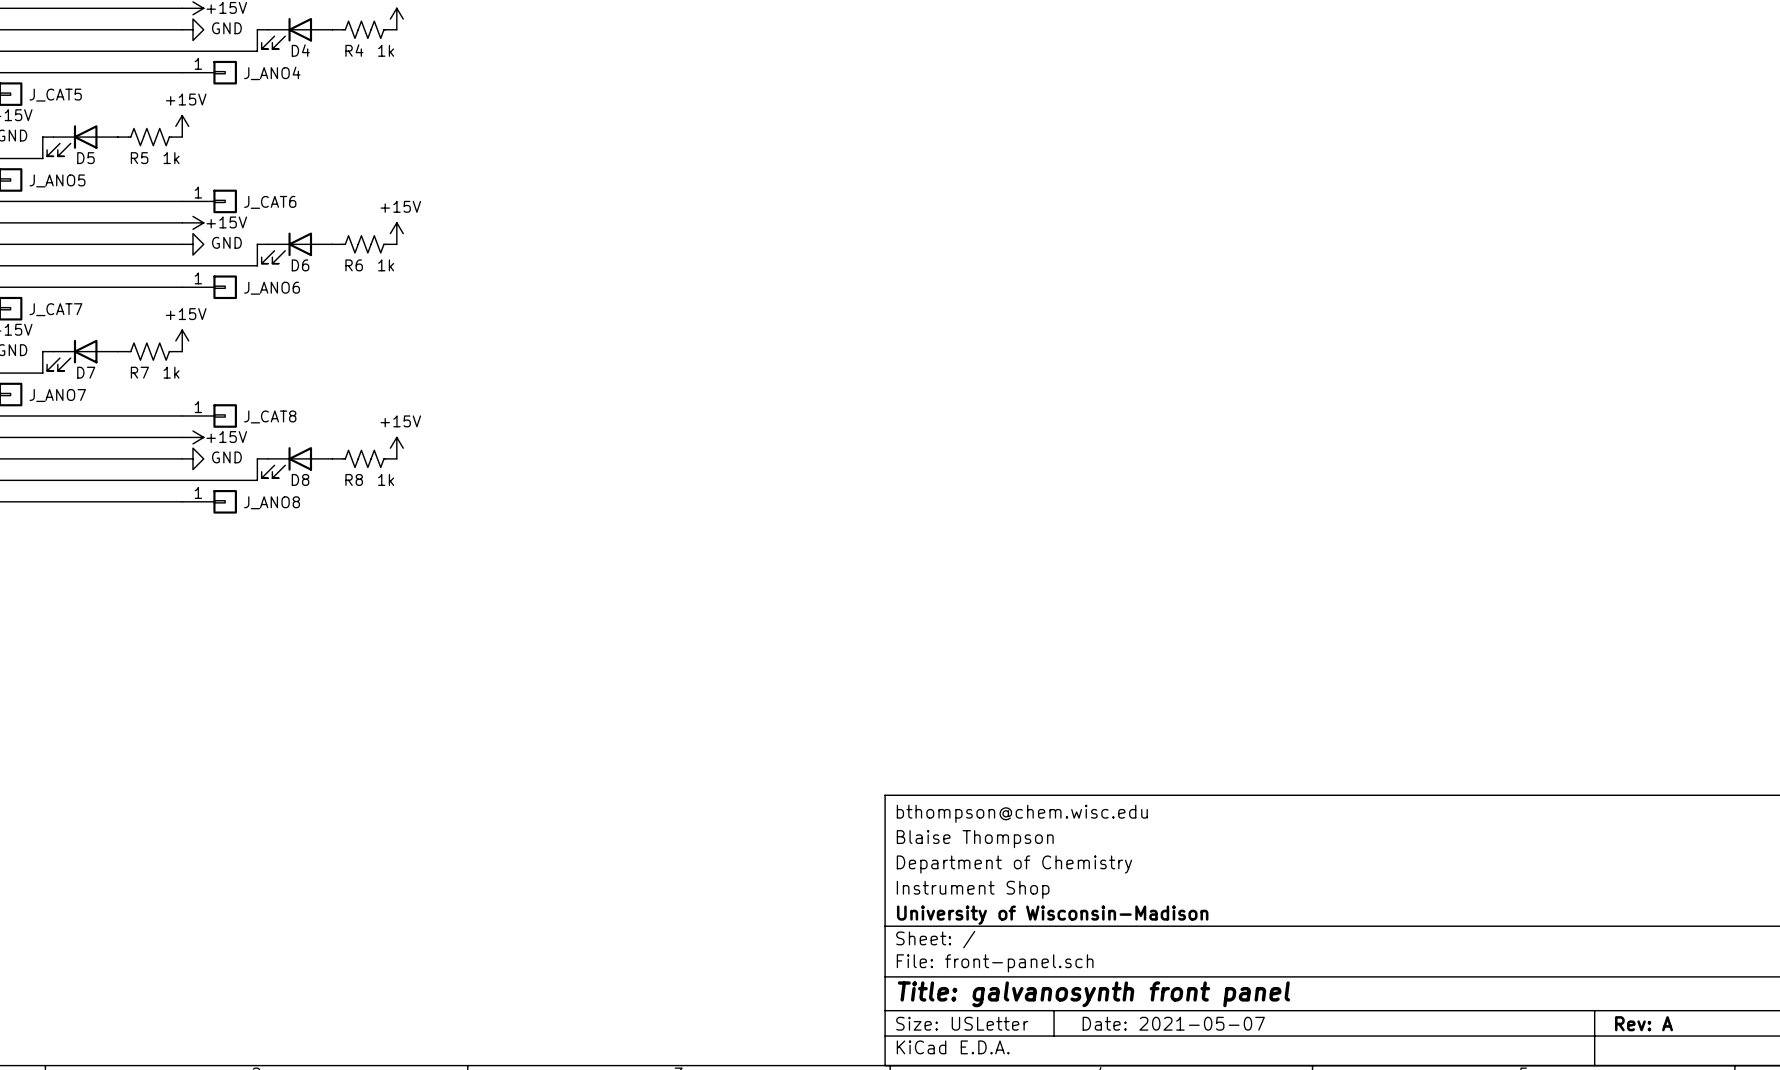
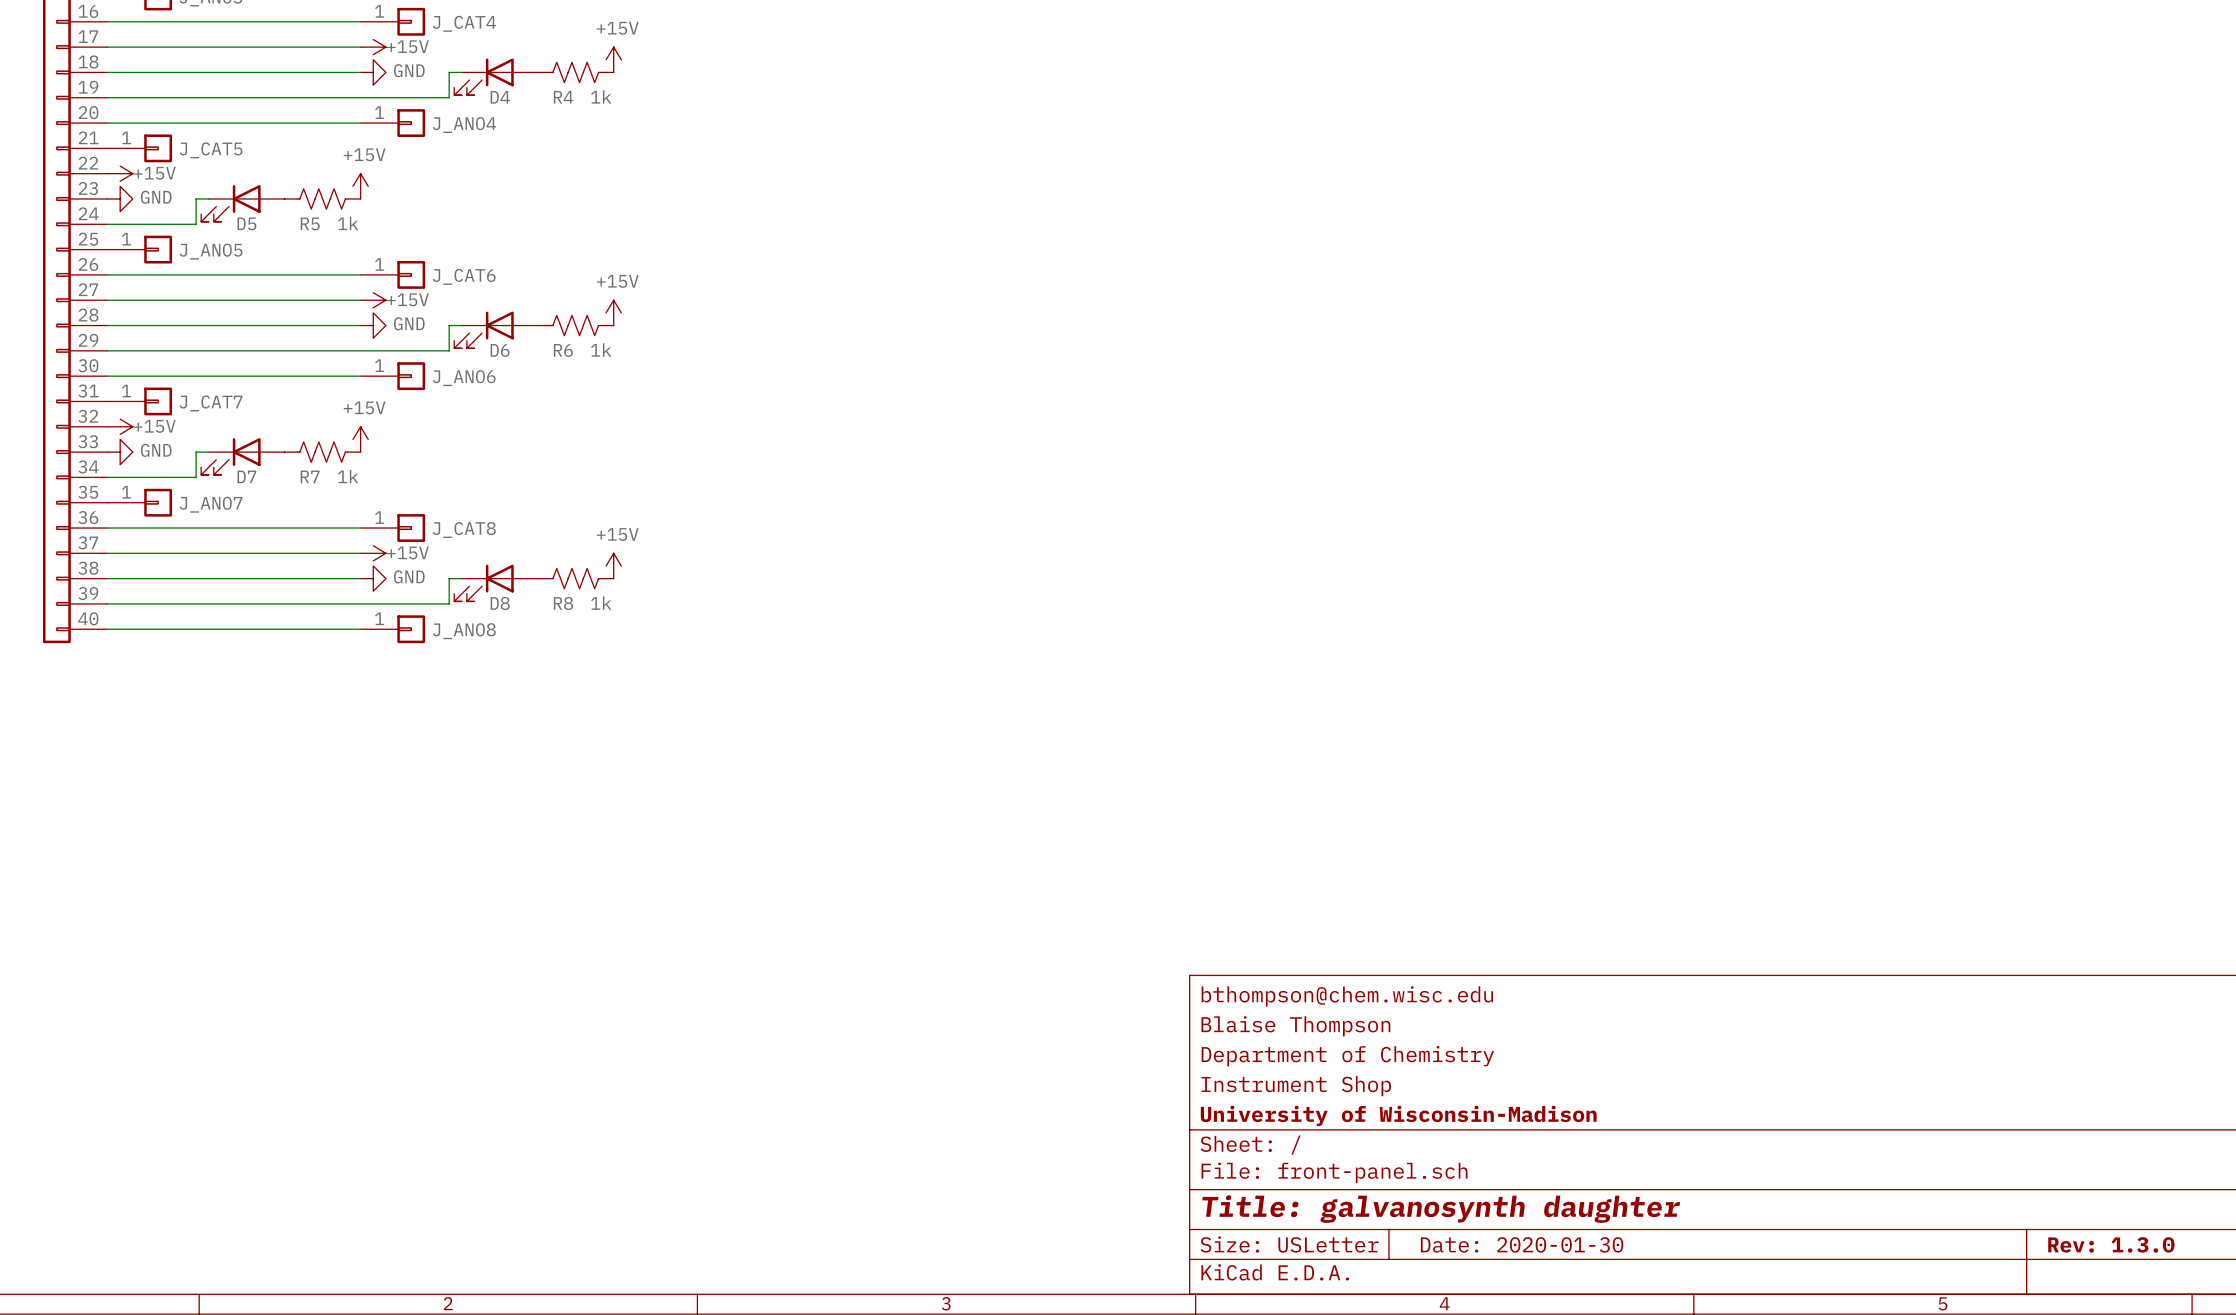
title block: Title: galvanosynth front panel (1093, 994) -> Title: galvanosynth daughter (1441, 1209)
title block: Date: 2021-05-07 (1173, 1023) -> Date: 2020-01-30 (1522, 1244)
title block: Rev: A (1644, 1023) -> Rev: 1.3.0 (2111, 1244)

